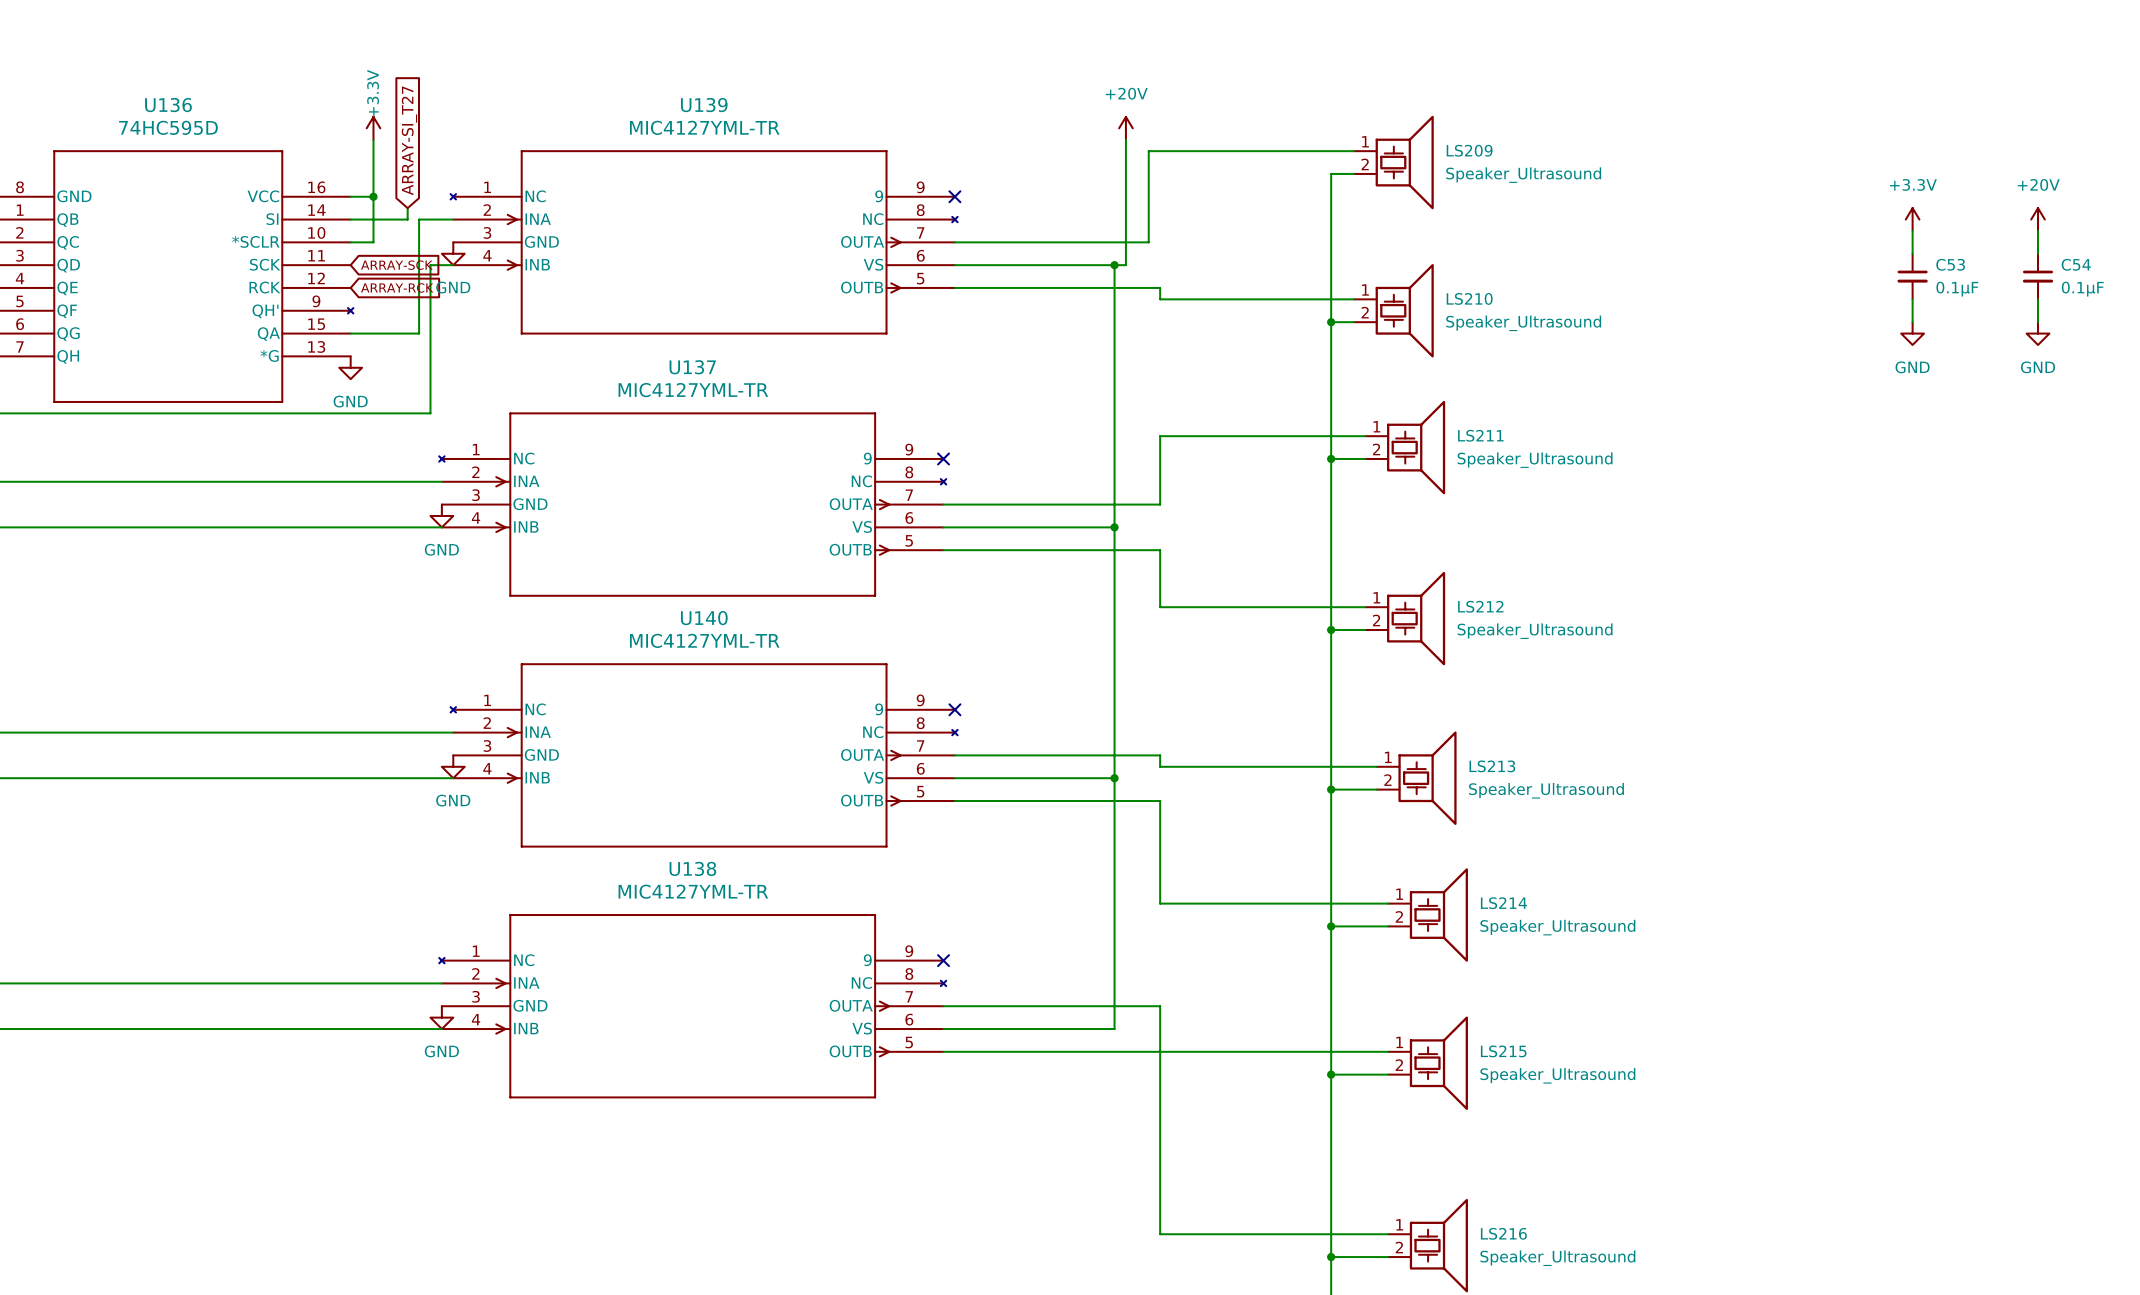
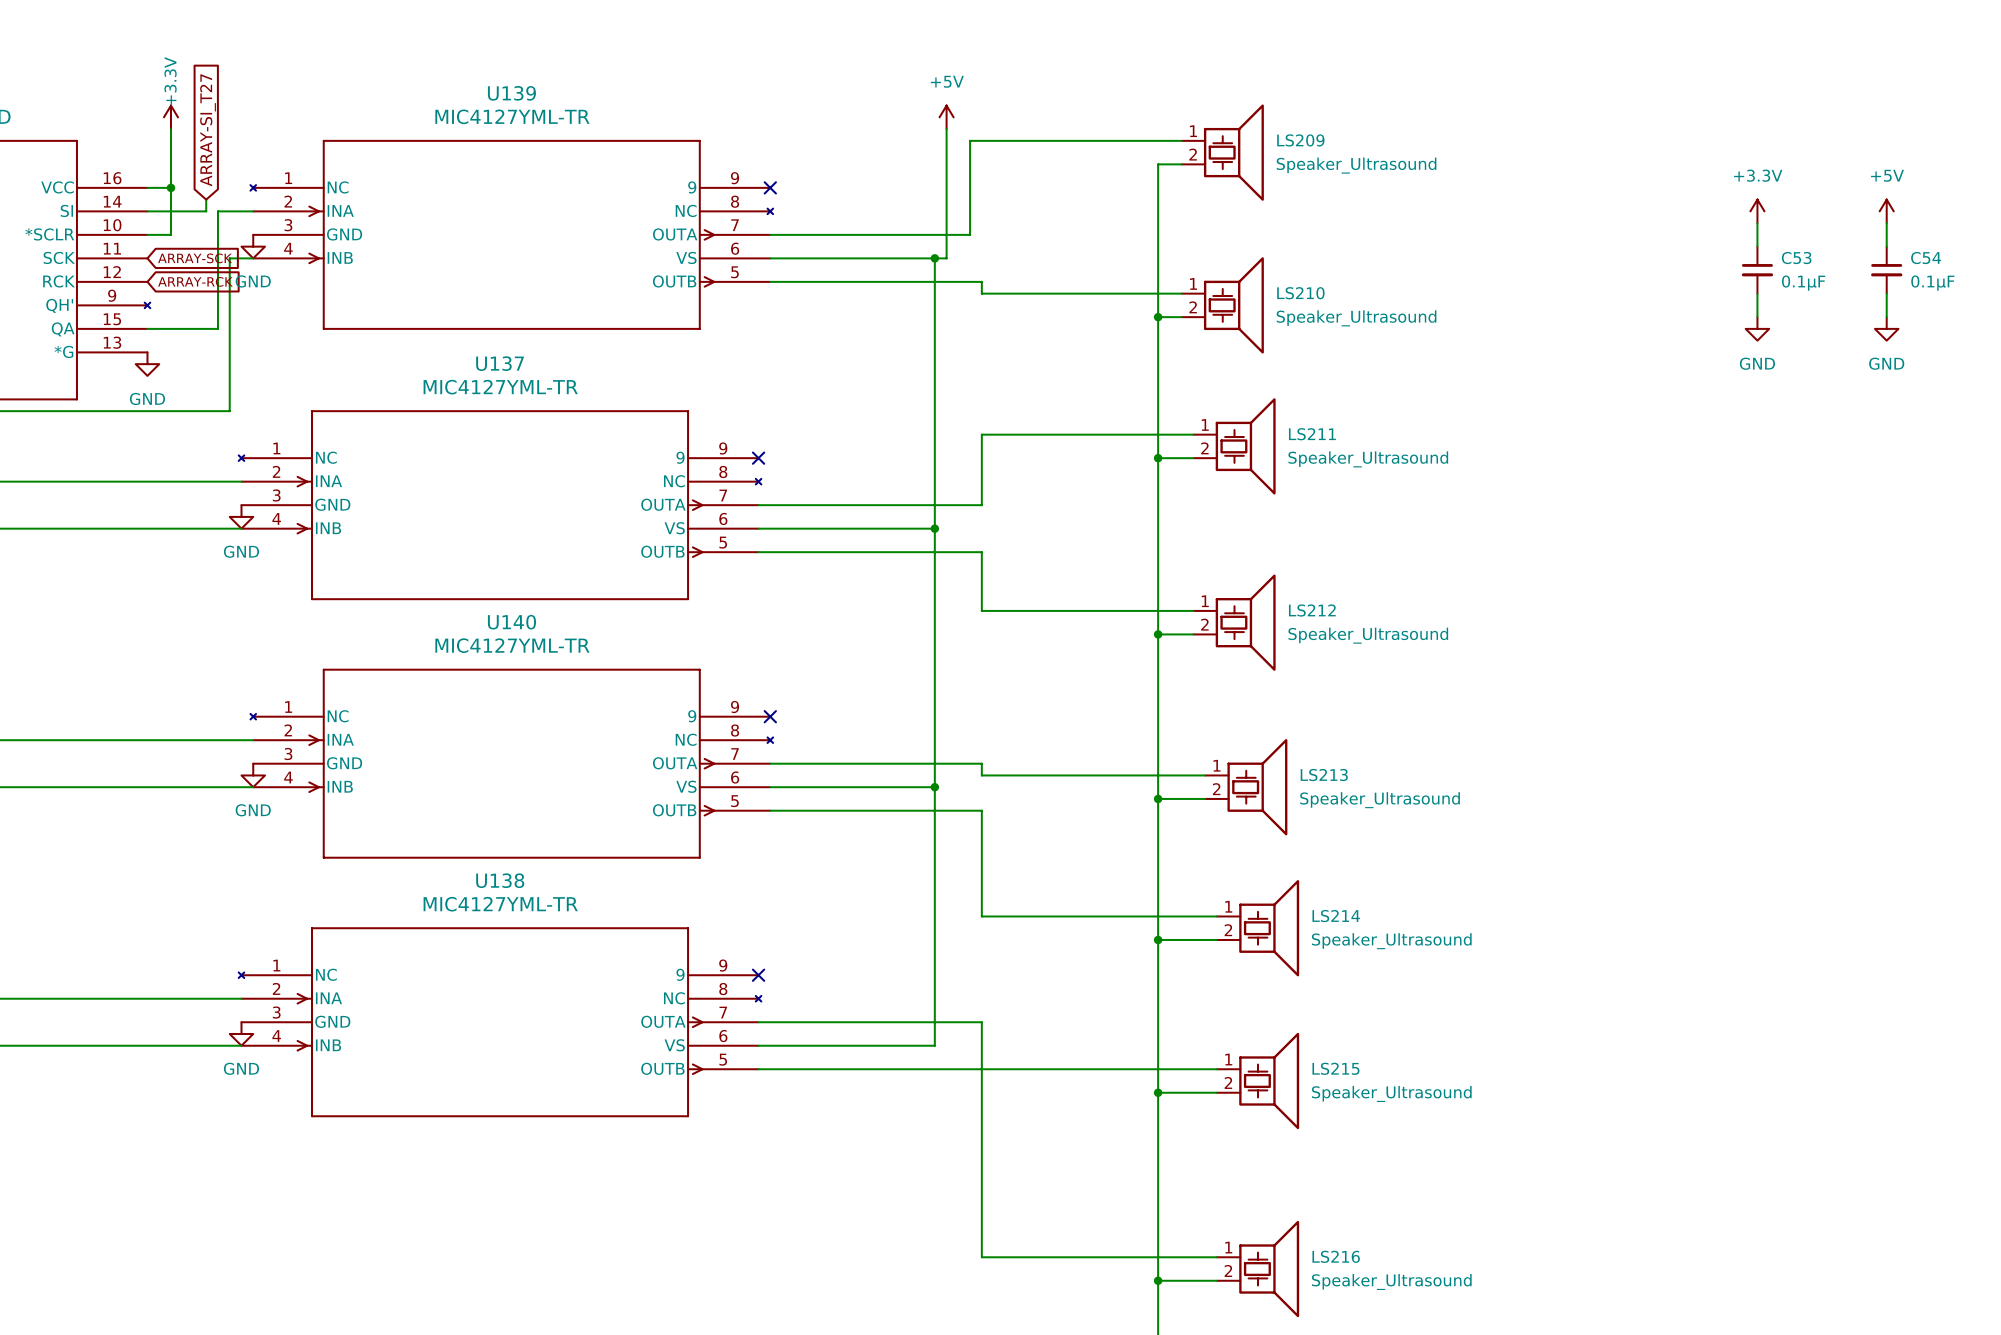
power symbol: +20V (1125, 128) -> +5V (946, 117)
power symbol: +20V (2038, 219) -> +5V (1886, 211)

